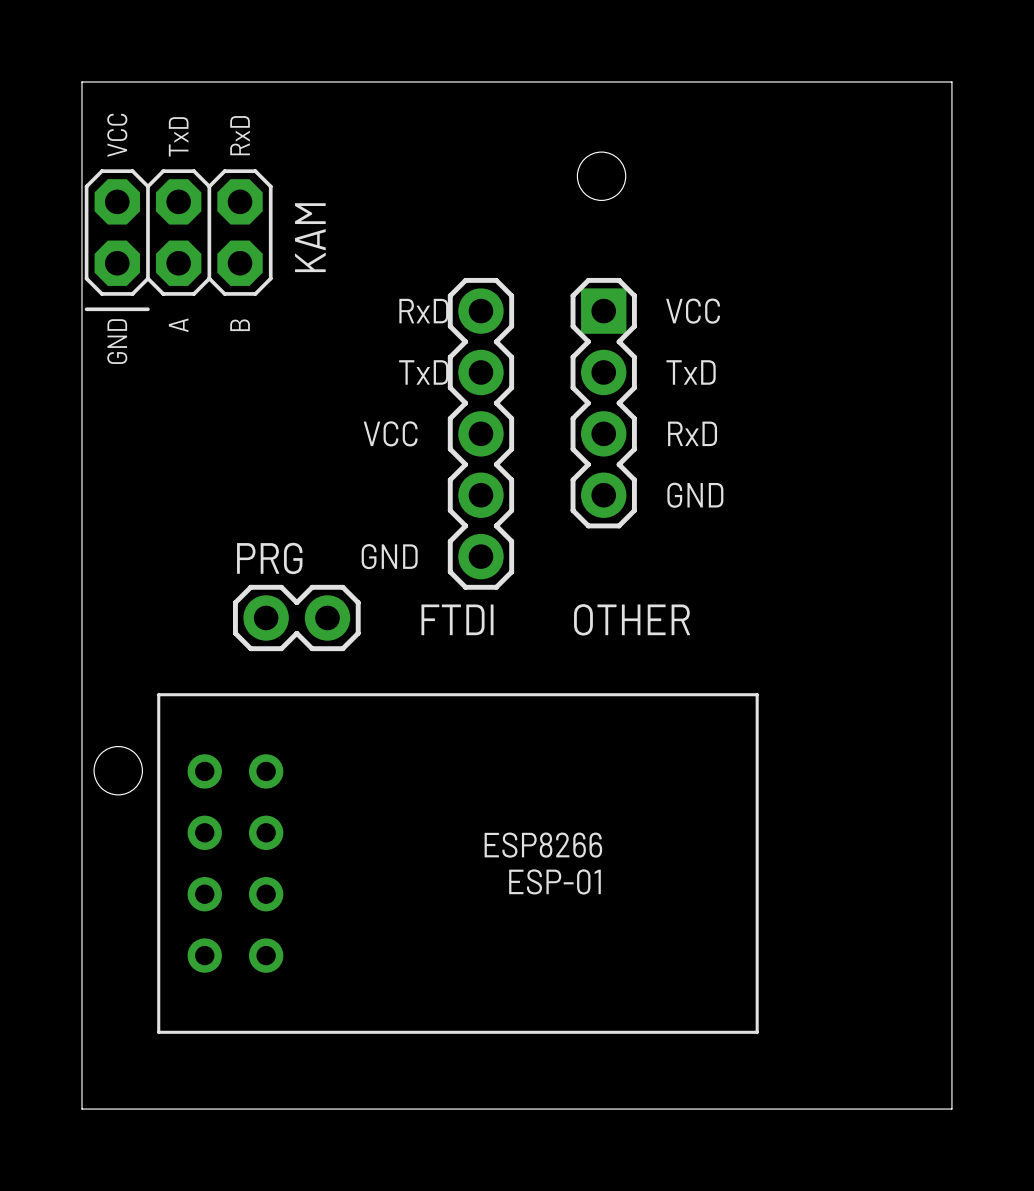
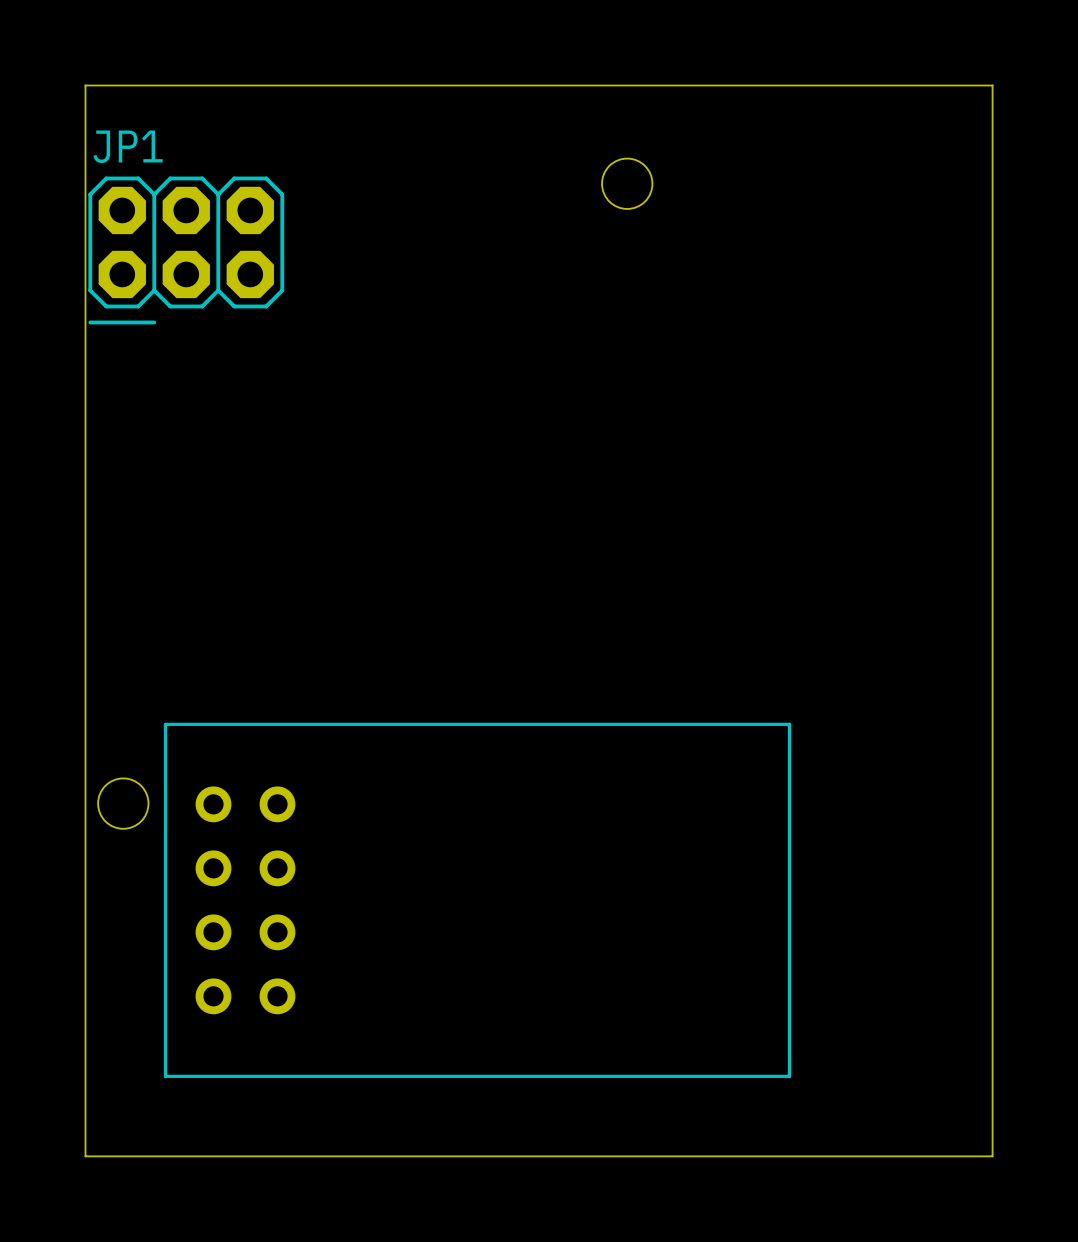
text: VCC (117, 135) -> none
text: RxD (240, 135) -> none
text: TxD (178, 136) -> none
KAM name: KAM (310, 237) -> JP1 (127, 146)
text: RxD (423, 311) -> none
text: VCC (693, 311) -> none
text: A (178, 325) -> none
text: B (240, 325) -> none
text: GND (117, 341) -> none
text: TxD (423, 372) -> none
text: TxD (691, 372) -> none
OTHER: (603, 403) -> none
text: VCC (390, 433) -> none
FTDI: (480, 433) -> none
text: RxD (692, 433) -> none
text: GND (695, 495) -> none
text: GND (389, 556) -> none
PRG: (296, 617) -> none
text: ESP8266 (543, 845) -> none
text: ESP-01 (554, 881) -> none

